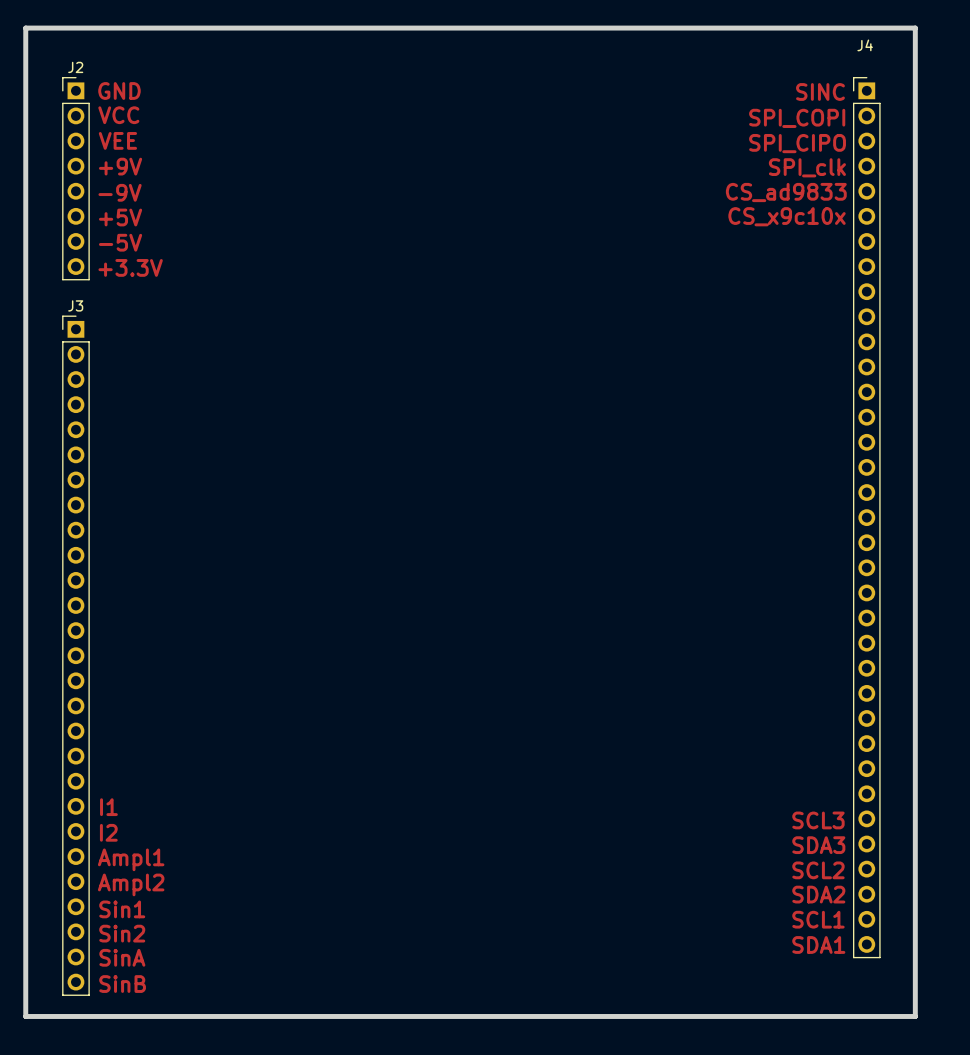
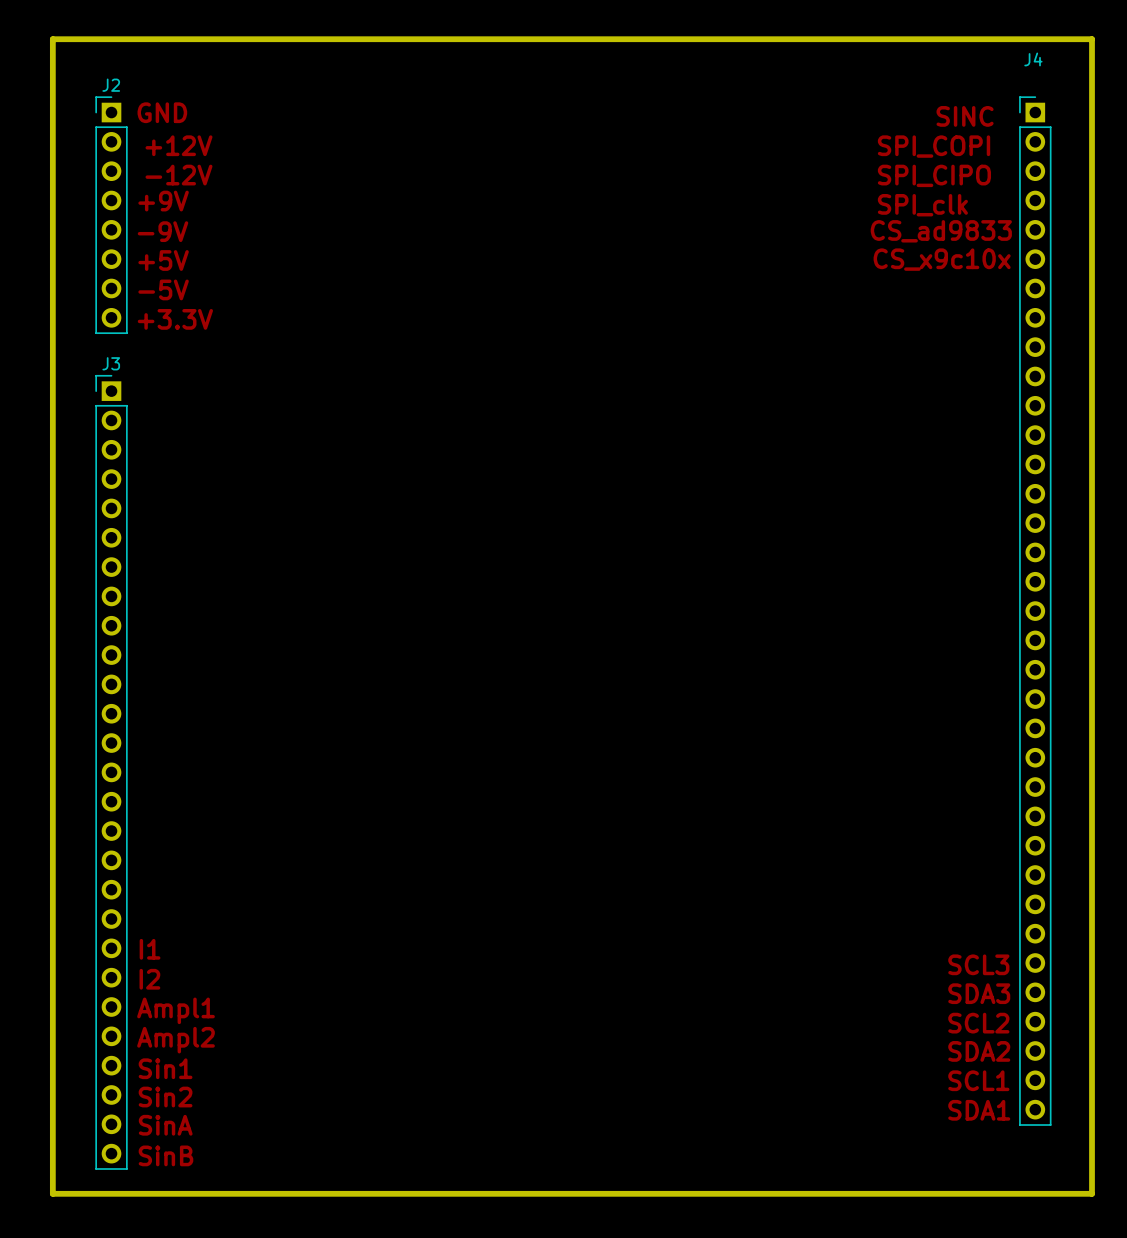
text position: SINC (820, 91) -> SINC (965, 116)
text: VCC (118, 115) -> +12V (178, 145)
text position: SPI_COPI (797, 118) -> SPI_COPI (934, 146)
text: VEE (117, 140) -> -12V (178, 175)
text position: SPI_CIPO (797, 143) -> SPI_CIPO (934, 175)
text position: SPI_clk (807, 167) -> SPI_clk (922, 205)

